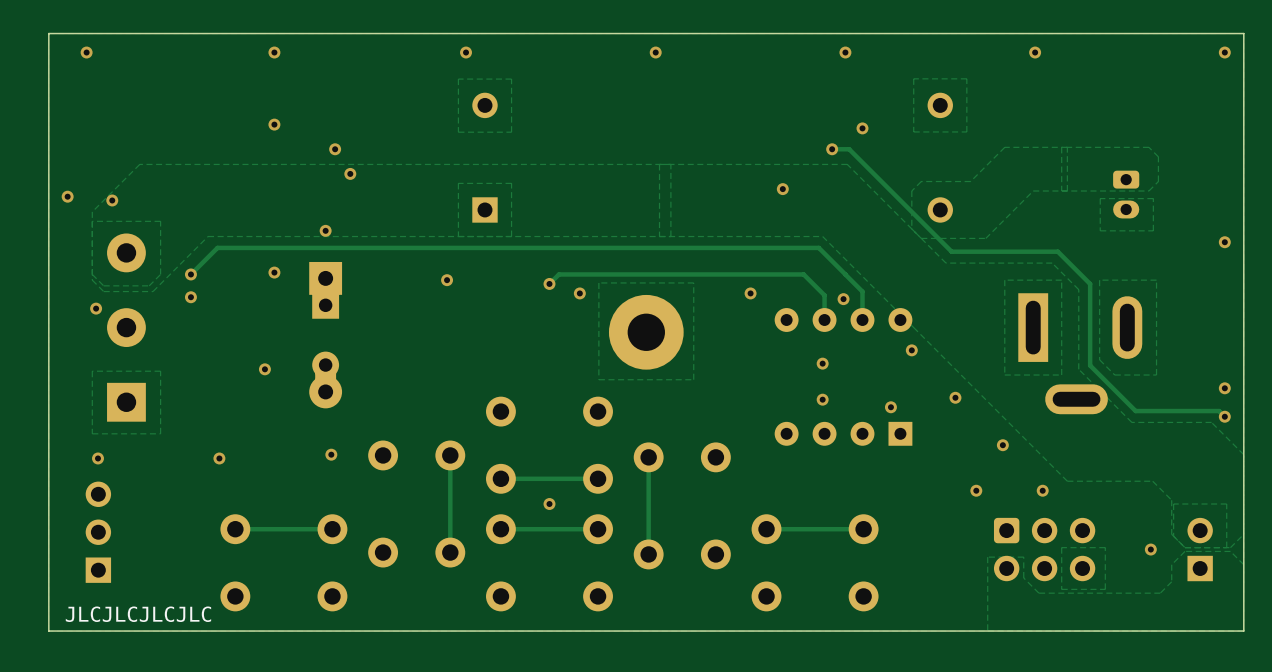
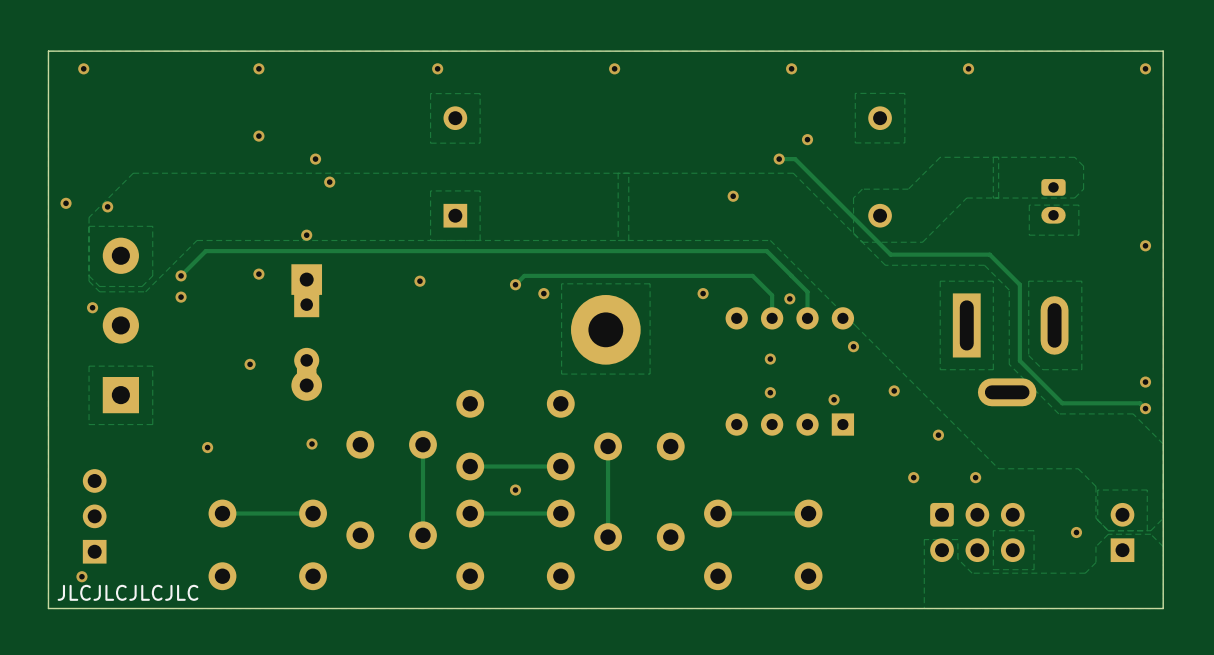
via: (98, 458) -> none
via: none -> (81, 576)

